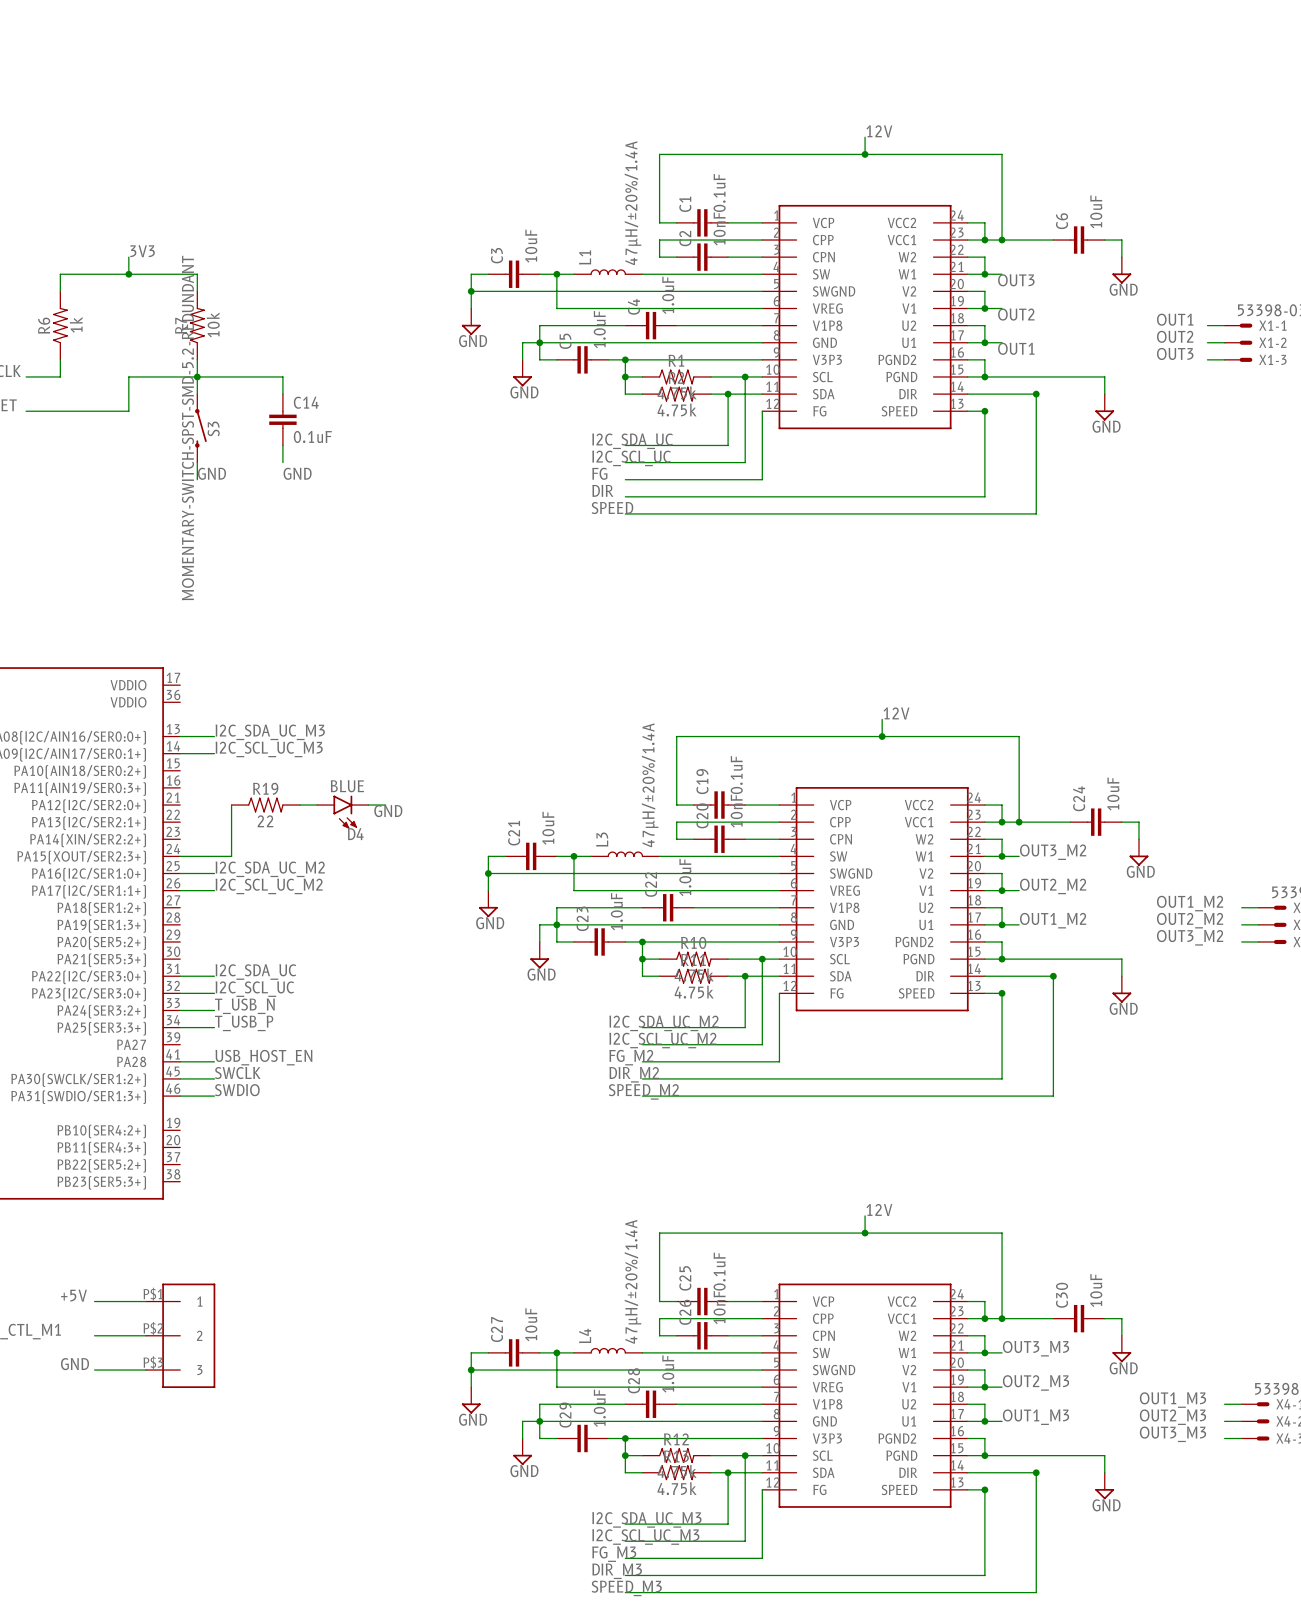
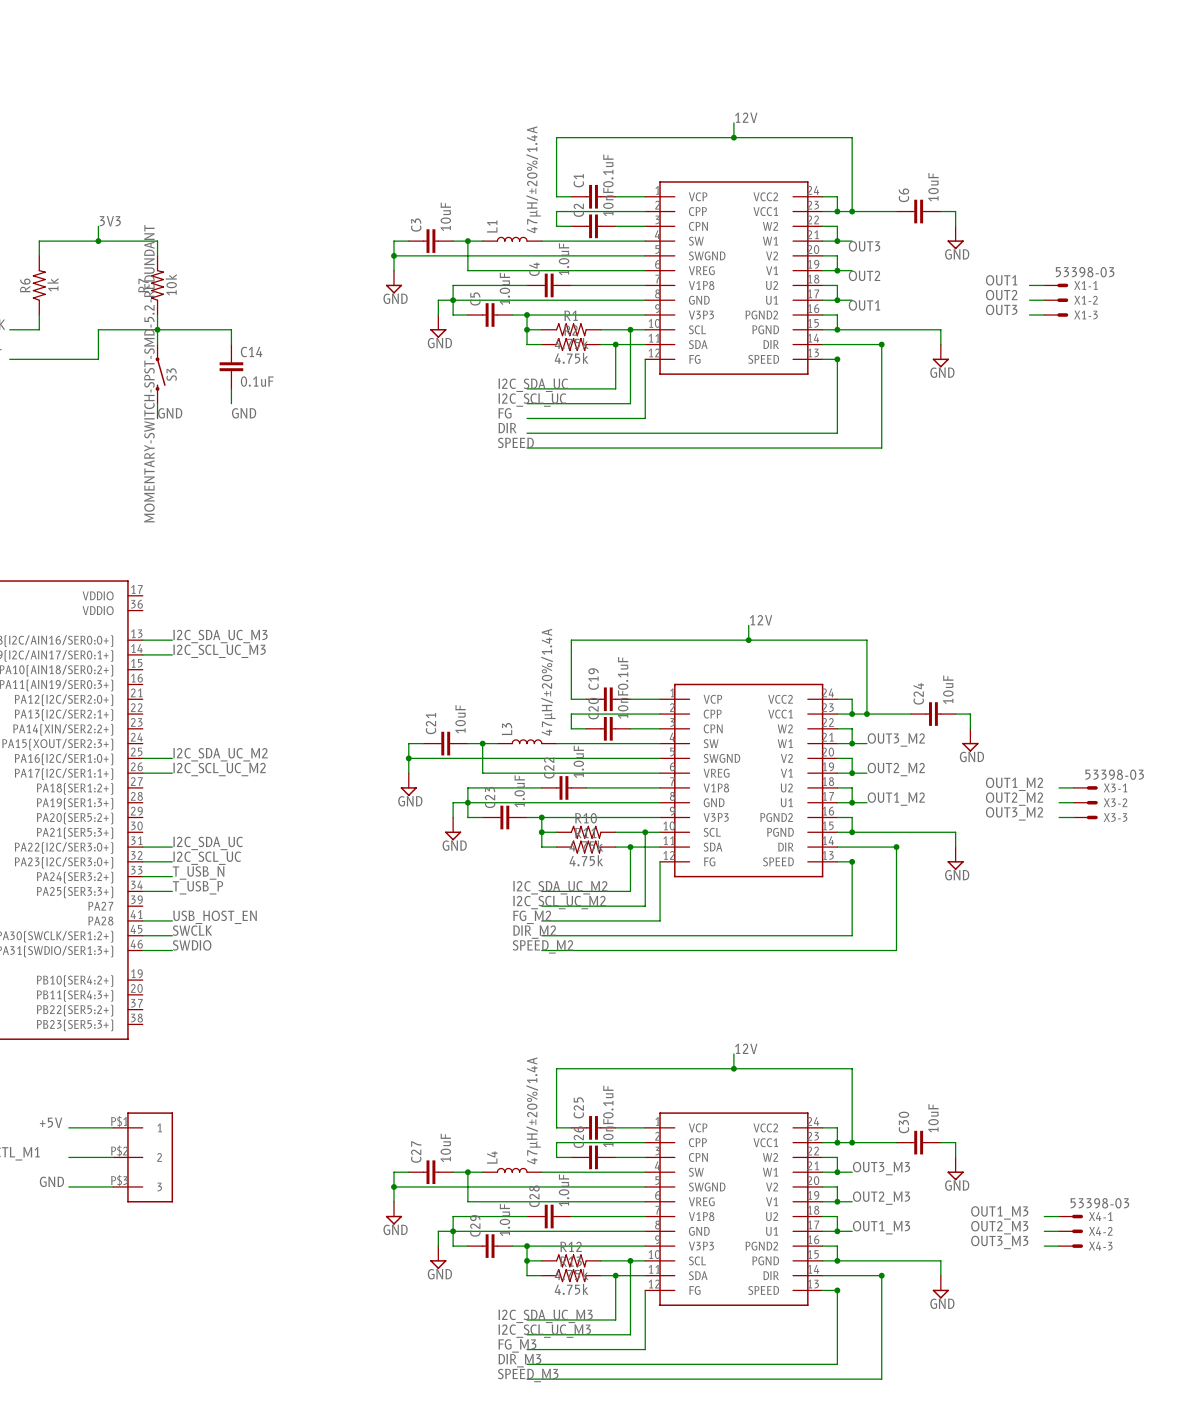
wire: (231, 805) (231, 856) (180, 856) -> none
R19: 22 (265, 805) -> none
wire: (300, 805) (317, 805) -> none
wire: (368, 805) (385, 805) -> none
label: GND (388, 811) -> none
D4: BLUE (342, 812) -> none

